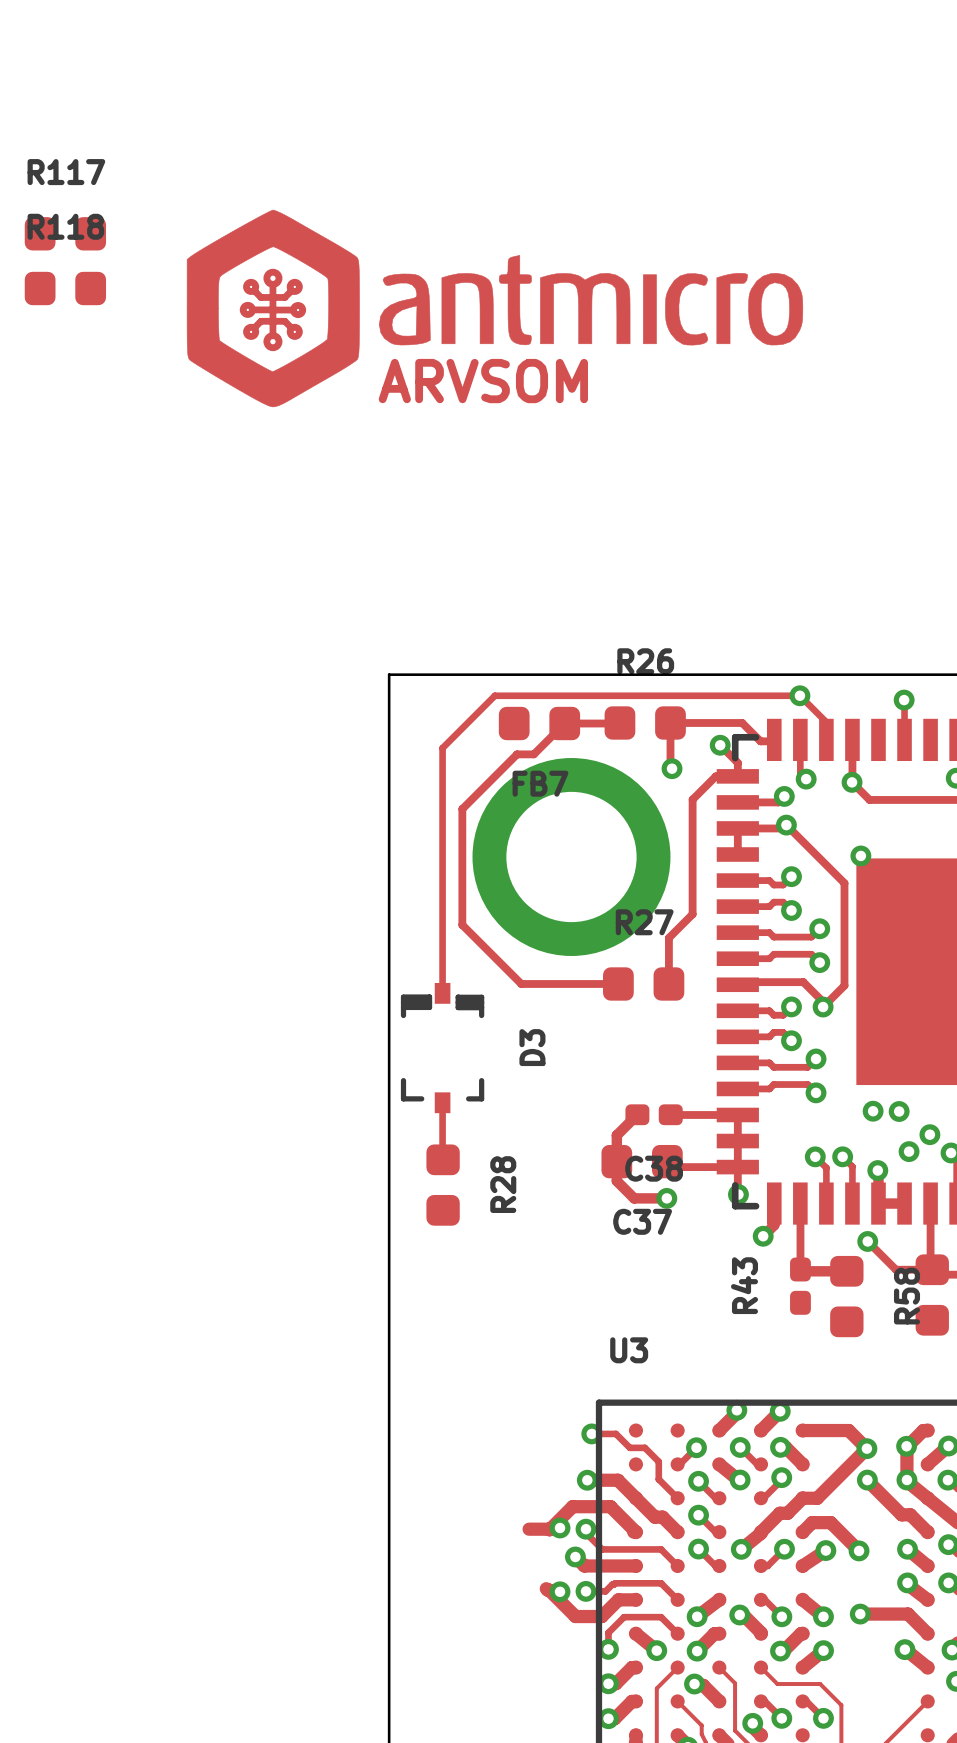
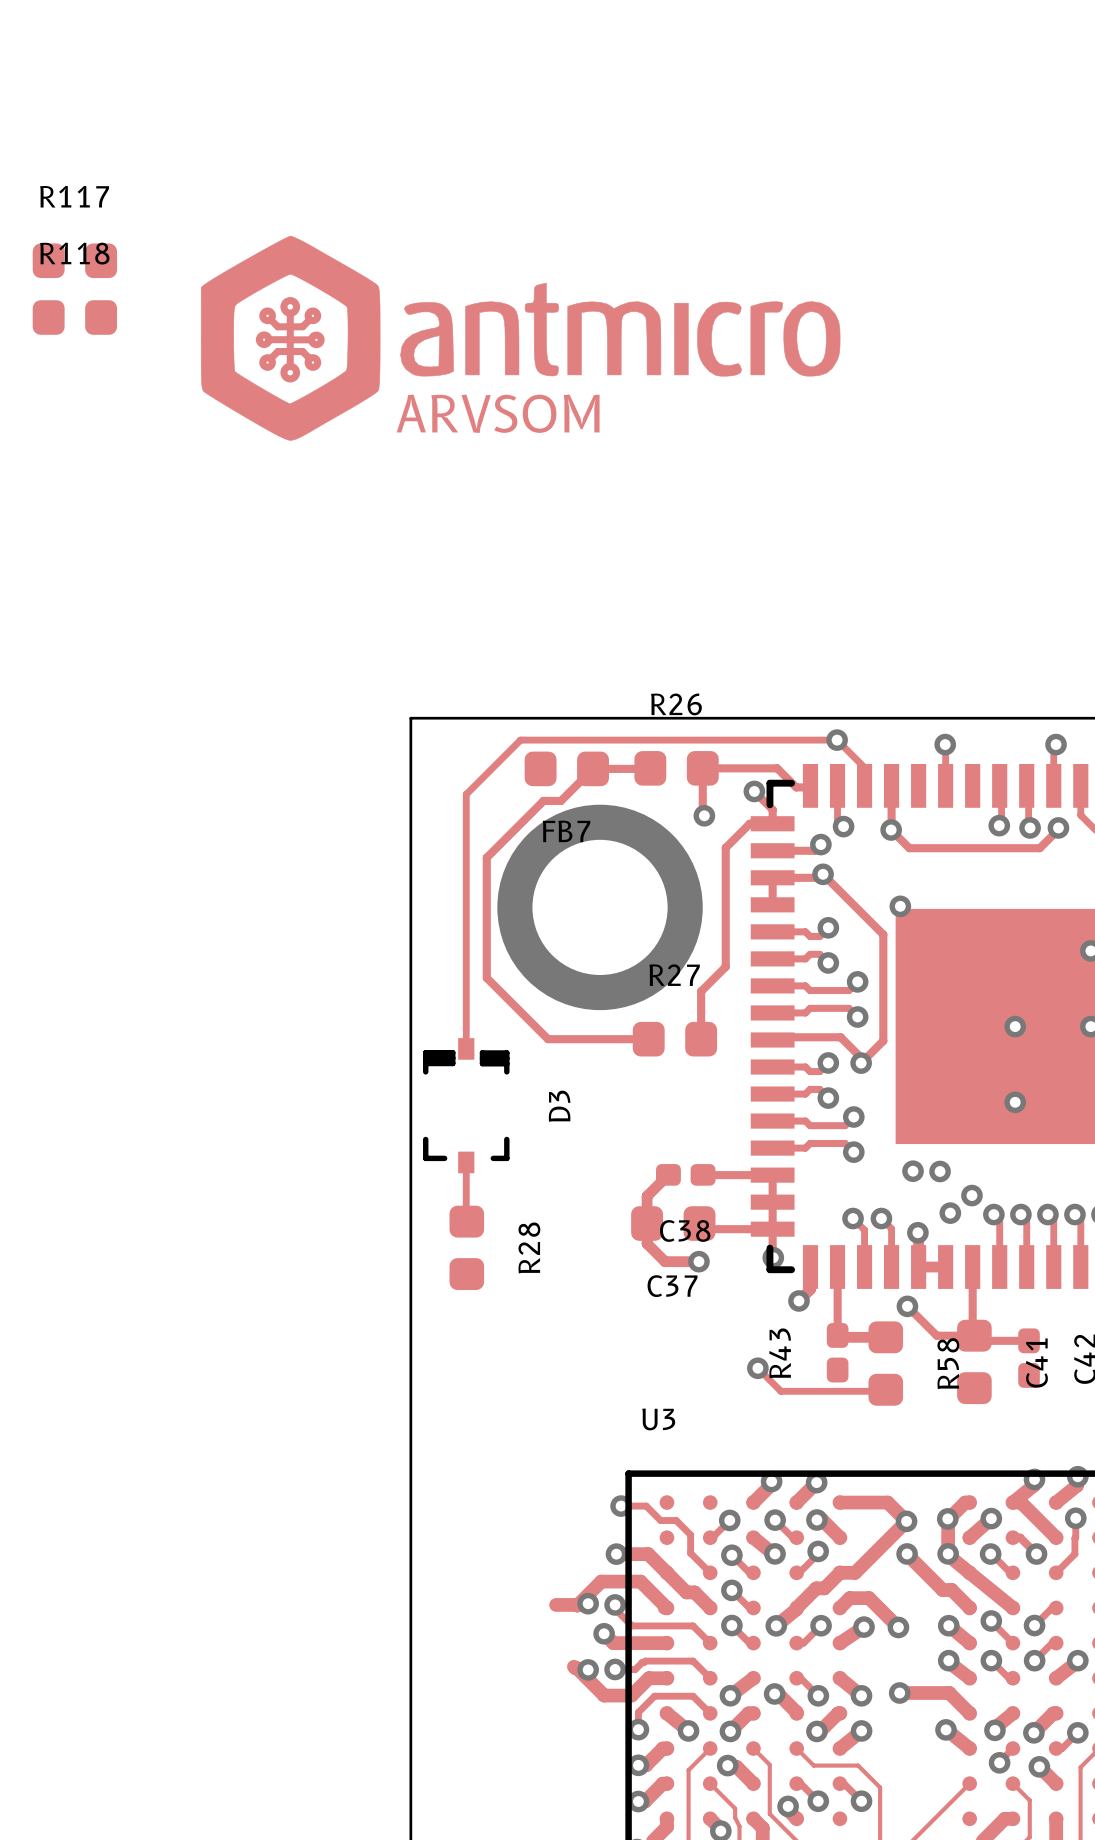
track: none -> (757, 1368) (780, 1391) (884, 1391) (885, 1389)
via: none -> (757, 1368)

